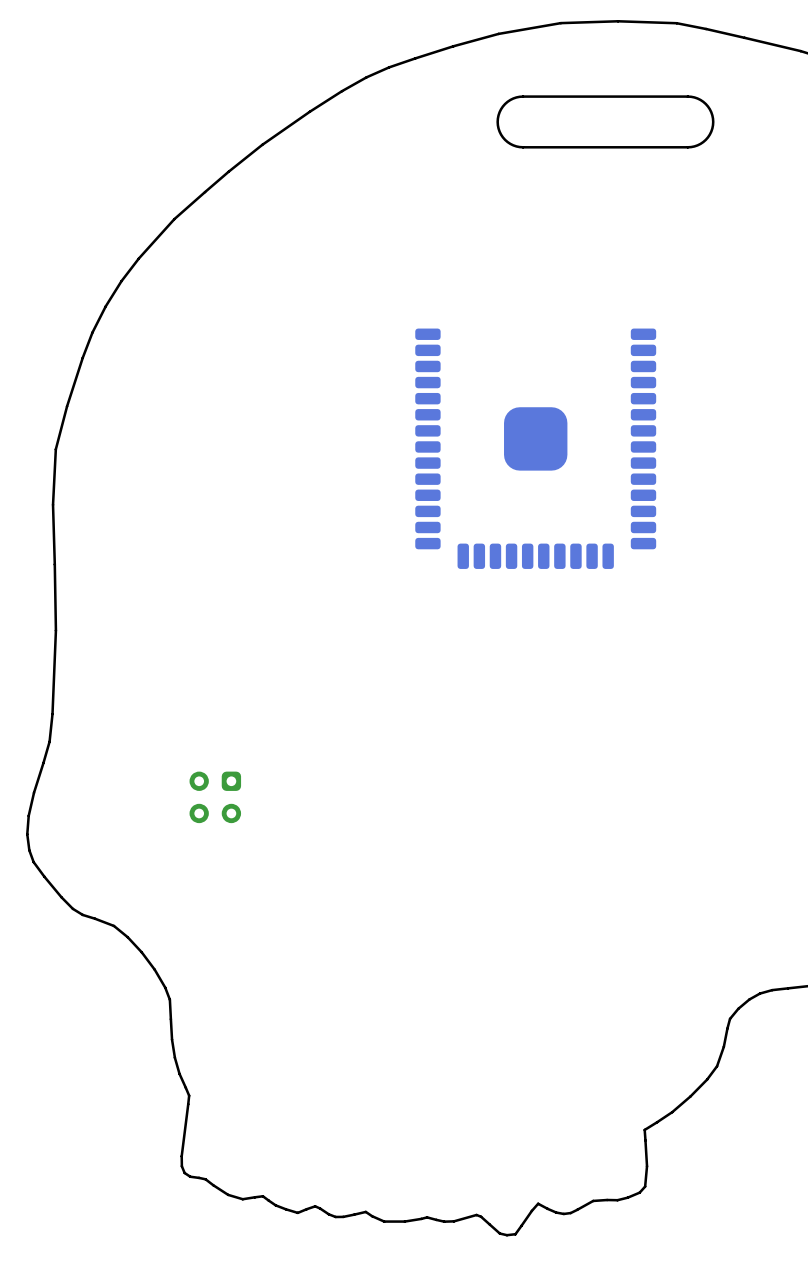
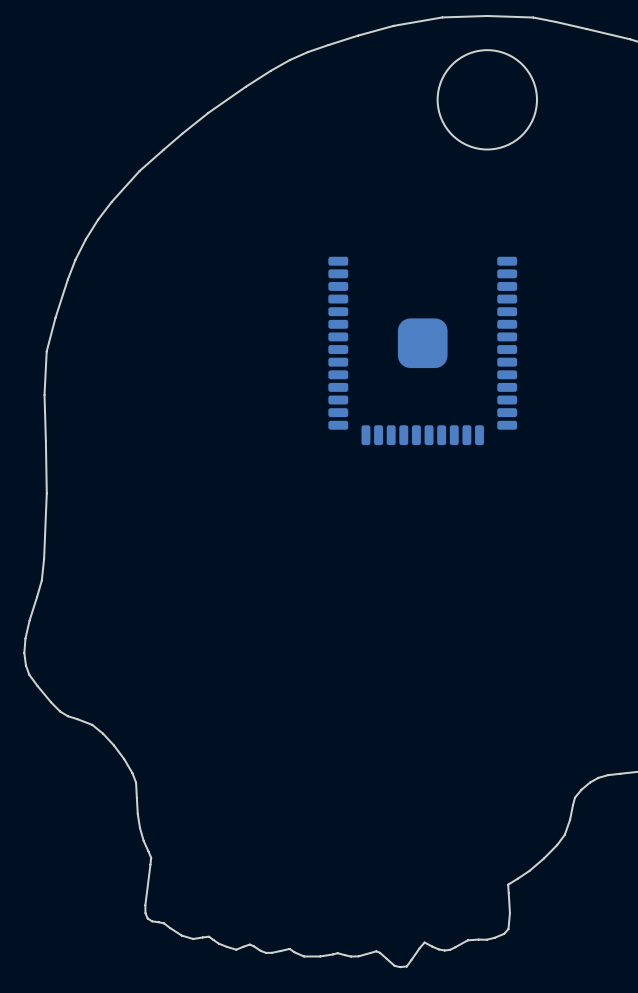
round board edge: none -> [436, 49, 538, 151]
board edge: (687, 96) (519, 96) (510, 99) (502, 106) (498, 115) (497, 125) (505, 139) (519, 147) (691, 147) (705, 139) (711, 131) (713, 121) (711, 112) (705, 104) (697, 98) (687, 96) -> none
part: (215, 797) -> none

